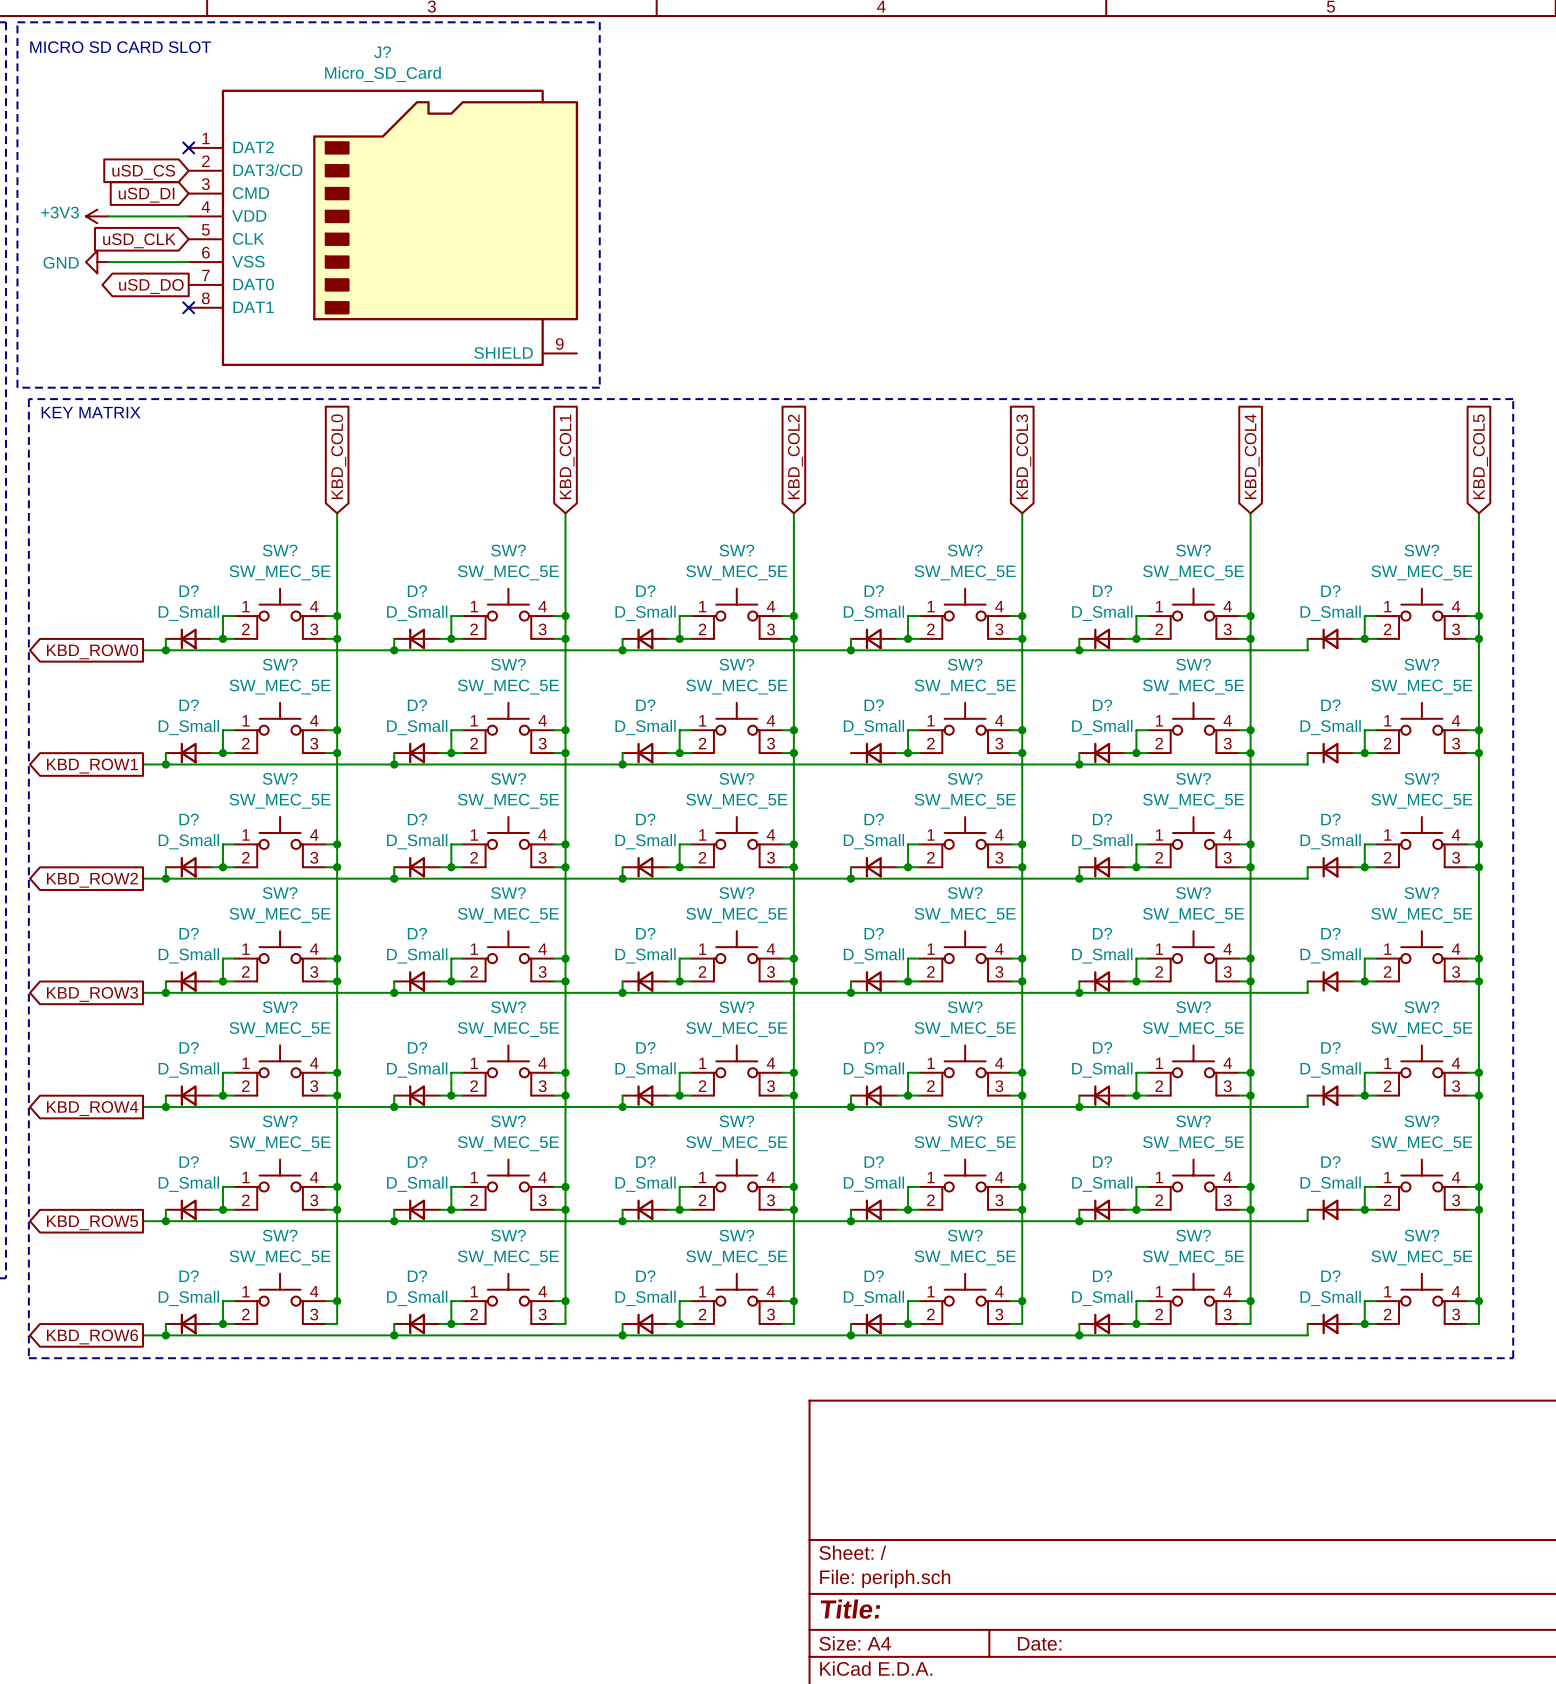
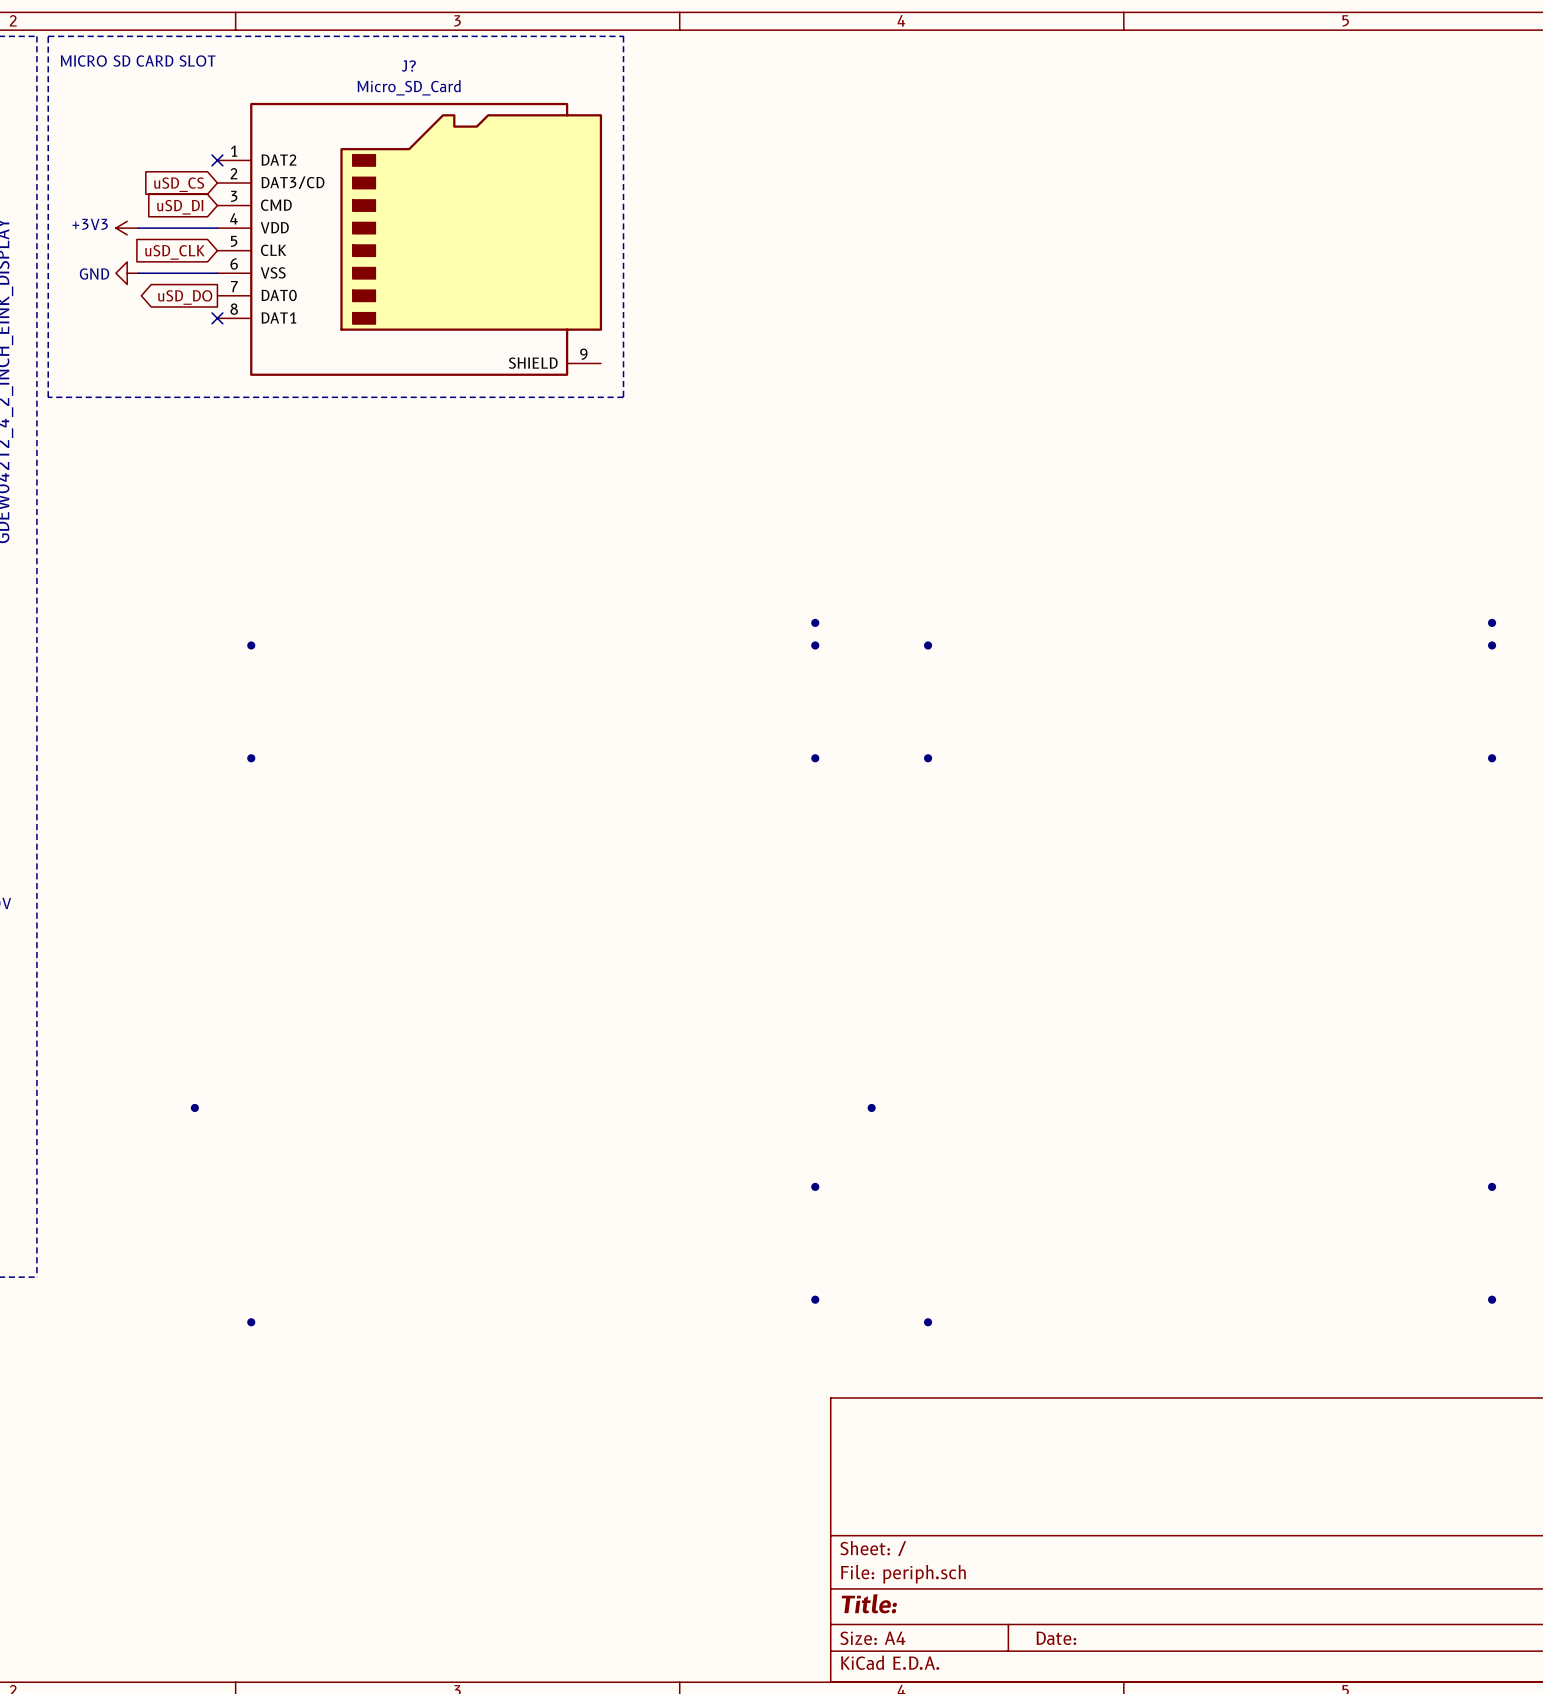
line: (28, 399) (28, 1358) (1513, 1358) (1513, 399) (28, 399) -> none
text: KEY MATRIX (91, 412) -> none
global label: KBD_COL0 (338, 456) -> none
global label: KBD_COL1 (567, 456) -> none
global label: KBD_COL2 (795, 456) -> none
global label: KBD_COL3 (1023, 456) -> none
global label: KBD_COL4 (1252, 456) -> none
global label: KBD_COL5 (1480, 456) -> none
wire: (337, 513) (337, 1323) (325, 1323) -> none
wire: (565, 513) (565, 1323) (554, 1323) -> none
wire: (793, 513) (793, 1323) (782, 1323) -> none
wire: (1022, 513) (1022, 1323) (1010, 1323) -> none
wire: (1250, 513) (1250, 1323) (1239, 1323) -> none
wire: (1478, 513) (1478, 1323) (1467, 1323) -> none
SW?: SW_MEC_5E (280, 613) -> none
SW?: SW_MEC_5E (508, 613) -> none
SW?: SW_MEC_5E (736, 613) -> none
SW?: SW_MEC_5E (965, 613) -> none
SW?: SW_MEC_5E (1193, 613) -> none
SW?: SW_MEC_5E (1421, 613) -> none
wire: (234, 616) (222, 616) (222, 638) -> none
wire: (325, 616) (337, 616) -> none
junction: (337, 616) -> none
wire: (462, 616) (451, 616) (451, 638) -> none
wire: (554, 616) (565, 616) -> none
junction: (565, 616) -> none
wire: (691, 616) (679, 616) (679, 638) -> none
wire: (782, 616) (793, 616) -> none
wire: (919, 616) (908, 616) (908, 638) -> none
wire: (1010, 616) (1022, 616) -> none
junction: (1022, 616) -> none
wire: (1147, 616) (1136, 616) (1136, 638) -> none
wire: (1239, 616) (1250, 616) -> none
junction: (1250, 616) -> none
wire: (1376, 616) (1364, 616) (1364, 638) -> none
wire: (1467, 616) (1478, 616) -> none
wire: (165, 638) (165, 650) -> none
D?: D_Small (188, 638) -> none
wire: (211, 638) (234, 638) -> none
wire: (325, 638) (337, 638) -> none
junction: (337, 638) -> none
wire: (394, 638) (394, 650) -> none
D?: D_Small (417, 638) -> none
wire: (439, 638) (462, 638) -> none
junction: (451, 638) -> none
wire: (554, 638) (565, 638) -> none
junction: (565, 638) -> none
wire: (622, 638) (622, 650) -> none
D?: D_Small (645, 638) -> none
wire: (668, 638) (691, 638) -> none
junction: (679, 638) -> none
wire: (782, 638) (793, 638) -> none
wire: (850, 638) (850, 650) -> none
D?: D_Small (873, 638) -> none
wire: (896, 638) (919, 638) -> none
wire: (1010, 638) (1022, 638) -> none
junction: (1022, 638) -> none
wire: (1079, 638) (1079, 650) -> none
D?: D_Small (1102, 638) -> none
wire: (1124, 638) (1147, 638) -> none
junction: (1136, 638) -> none
wire: (1239, 638) (1250, 638) -> none
junction: (1250, 638) -> none
wire: (1307, 638) (1307, 650) (143, 650) -> none
D?: D_Small (1330, 638) -> none
wire: (1353, 638) (1376, 638) -> none
junction: (1364, 638) -> none
wire: (1467, 638) (1478, 638) -> none
junction: (165, 650) -> none
junction: (394, 650) -> none
junction: (622, 650) -> none
junction: (850, 650) -> none
junction: (1079, 650) -> none
global label: KBD_ROW0 (92, 651) -> none
SW?: SW_MEC_5E (280, 727) -> none
SW?: SW_MEC_5E (508, 727) -> none
SW?: SW_MEC_5E (736, 727) -> none
SW?: SW_MEC_5E (965, 727) -> none
SW?: SW_MEC_5E (1193, 727) -> none
SW?: SW_MEC_5E (1421, 727) -> none
wire: (234, 730) (222, 730) (222, 753) -> none
wire: (325, 730) (337, 730) -> none
junction: (337, 730) -> none
wire: (462, 730) (451, 730) (451, 753) -> none
wire: (554, 730) (565, 730) -> none
junction: (565, 730) -> none
wire: (691, 730) (679, 730) (679, 753) -> none
wire: (782, 730) (793, 730) -> none
junction: (793, 730) -> none
wire: (919, 730) (908, 730) (908, 753) -> none
wire: (1010, 730) (1022, 730) -> none
junction: (1022, 730) -> none
wire: (1147, 730) (1136, 730) (1136, 753) -> none
wire: (1239, 730) (1250, 730) -> none
junction: (1250, 730) -> none
wire: (1376, 730) (1364, 730) (1364, 753) -> none
wire: (1467, 730) (1478, 730) -> none
junction: (1478, 730) -> none
wire: (165, 753) (165, 764) -> none
D?: D_Small (188, 753) -> none
wire: (211, 753) (234, 753) -> none
wire: (325, 753) (337, 753) -> none
junction: (337, 753) -> none
wire: (394, 753) (394, 764) -> none
D?: D_Small (417, 753) -> none
wire: (439, 753) (462, 753) -> none
junction: (451, 753) -> none
wire: (554, 753) (565, 753) -> none
junction: (565, 753) -> none
wire: (622, 753) (622, 764) -> none
D?: D_Small (645, 753) -> none
wire: (668, 753) (691, 753) -> none
junction: (679, 753) -> none
wire: (782, 753) (793, 753) -> none
D?: D_Small (873, 753) -> none
wire: (896, 753) (919, 753) -> none
wire: (1010, 753) (1022, 753) -> none
junction: (1022, 753) -> none
wire: (1079, 753) (1079, 764) -> none
D?: D_Small (1102, 753) -> none
wire: (1124, 753) (1147, 753) -> none
junction: (1136, 753) -> none
wire: (1239, 753) (1250, 753) -> none
junction: (1250, 753) -> none
wire: (1307, 753) (1307, 764) (143, 764) -> none
D?: D_Small (1330, 753) -> none
wire: (1353, 753) (1376, 753) -> none
junction: (1364, 753) -> none
wire: (1467, 753) (1478, 753) -> none
junction: (165, 764) -> none
junction: (394, 764) -> none
junction: (622, 764) -> none
junction: (1079, 764) -> none
global label: KBD_ROW1 (92, 766) -> none
SW?: SW_MEC_5E (280, 842) -> none
SW?: SW_MEC_5E (508, 842) -> none
SW?: SW_MEC_5E (736, 842) -> none
SW?: SW_MEC_5E (965, 842) -> none
SW?: SW_MEC_5E (1193, 842) -> none
SW?: SW_MEC_5E (1421, 842) -> none
wire: (234, 844) (222, 844) (222, 867) -> none
wire: (325, 844) (337, 844) -> none
junction: (337, 844) -> none
wire: (462, 844) (451, 844) (451, 867) -> none
wire: (554, 844) (565, 844) -> none
junction: (565, 844) -> none
wire: (691, 844) (679, 844) (679, 867) -> none
wire: (782, 844) (793, 844) -> none
junction: (793, 844) -> none
wire: (919, 844) (908, 844) (908, 867) -> none
wire: (1010, 844) (1022, 844) -> none
junction: (1022, 844) -> none
wire: (1147, 844) (1136, 844) (1136, 867) -> none
wire: (1239, 844) (1250, 844) -> none
junction: (1250, 844) -> none
wire: (1376, 844) (1364, 844) (1364, 867) -> none
wire: (1467, 844) (1478, 844) -> none
junction: (1478, 844) -> none
wire: (165, 867) (165, 878) -> none
D?: D_Small (188, 867) -> none
wire: (211, 867) (234, 867) -> none
junction: (222, 867) -> none
wire: (325, 867) (337, 867) -> none
junction: (337, 867) -> none
wire: (394, 867) (394, 878) -> none
D?: D_Small (417, 867) -> none
wire: (439, 867) (462, 867) -> none
junction: (451, 867) -> none
wire: (554, 867) (565, 867) -> none
junction: (565, 867) -> none
wire: (622, 867) (622, 878) -> none
D?: D_Small (645, 867) -> none
wire: (668, 867) (691, 867) -> none
junction: (679, 867) -> none
wire: (782, 867) (793, 867) -> none
junction: (793, 867) -> none
wire: (850, 867) (850, 878) -> none
D?: D_Small (873, 867) -> none
wire: (896, 867) (919, 867) -> none
junction: (908, 867) -> none
wire: (1010, 867) (1022, 867) -> none
junction: (1022, 867) -> none
wire: (1079, 867) (1079, 878) -> none
D?: D_Small (1102, 867) -> none
wire: (1124, 867) (1147, 867) -> none
junction: (1136, 867) -> none
wire: (1239, 867) (1250, 867) -> none
junction: (1250, 867) -> none
wire: (1307, 867) (1307, 878) (143, 878) -> none
D?: D_Small (1330, 867) -> none
wire: (1353, 867) (1376, 867) -> none
junction: (1364, 867) -> none
wire: (1467, 867) (1478, 867) -> none
junction: (1478, 867) -> none
junction: (165, 878) -> none
junction: (394, 878) -> none
junction: (622, 878) -> none
junction: (850, 878) -> none
junction: (1079, 878) -> none
global label: KBD_ROW2 (92, 880) -> none
SW?: SW_MEC_5E (280, 956) -> none
SW?: SW_MEC_5E (508, 956) -> none
SW?: SW_MEC_5E (736, 956) -> none
SW?: SW_MEC_5E (965, 956) -> none
SW?: SW_MEC_5E (1193, 956) -> none
SW?: SW_MEC_5E (1421, 956) -> none
wire: (234, 958) (222, 958) (222, 981) -> none
wire: (325, 958) (337, 958) -> none
junction: (337, 958) -> none
wire: (462, 958) (451, 958) (451, 981) -> none
wire: (554, 958) (565, 958) -> none
junction: (565, 958) -> none
wire: (691, 958) (679, 958) (679, 981) -> none
wire: (782, 958) (793, 958) -> none
junction: (793, 958) -> none
wire: (919, 958) (908, 958) (908, 981) -> none
wire: (1010, 958) (1022, 958) -> none
junction: (1022, 958) -> none
wire: (1147, 958) (1136, 958) (1136, 981) -> none
wire: (1239, 958) (1250, 958) -> none
junction: (1250, 958) -> none
wire: (1376, 958) (1364, 958) (1364, 981) -> none
wire: (1467, 958) (1478, 958) -> none
junction: (1478, 958) -> none
wire: (165, 981) (165, 992) -> none
D?: D_Small (188, 981) -> none
wire: (211, 981) (234, 981) -> none
junction: (222, 981) -> none
wire: (325, 981) (337, 981) -> none
junction: (337, 981) -> none
wire: (394, 981) (394, 992) -> none
D?: D_Small (417, 981) -> none
wire: (439, 981) (462, 981) -> none
junction: (451, 981) -> none
wire: (554, 981) (565, 981) -> none
junction: (565, 981) -> none
wire: (622, 981) (622, 992) -> none
D?: D_Small (645, 981) -> none
wire: (668, 981) (691, 981) -> none
junction: (679, 981) -> none
wire: (782, 981) (793, 981) -> none
junction: (793, 981) -> none
wire: (850, 981) (850, 992) -> none
D?: D_Small (873, 981) -> none
wire: (896, 981) (919, 981) -> none
junction: (908, 981) -> none
wire: (1010, 981) (1022, 981) -> none
junction: (1022, 981) -> none
wire: (1079, 981) (1079, 992) -> none
D?: D_Small (1102, 981) -> none
wire: (1124, 981) (1147, 981) -> none
junction: (1136, 981) -> none
wire: (1239, 981) (1250, 981) -> none
junction: (1250, 981) -> none
wire: (1307, 981) (1307, 992) (143, 992) -> none
D?: D_Small (1330, 981) -> none
wire: (1353, 981) (1376, 981) -> none
junction: (1364, 981) -> none
wire: (1467, 981) (1478, 981) -> none
junction: (1478, 981) -> none
junction: (165, 992) -> none
junction: (394, 992) -> none
junction: (622, 992) -> none
junction: (850, 992) -> none
junction: (1079, 992) -> none
global label: KBD_ROW3 (92, 994) -> none
SW?: SW_MEC_5E (280, 1070) -> none
SW?: SW_MEC_5E (508, 1070) -> none
SW?: SW_MEC_5E (736, 1070) -> none
SW?: SW_MEC_5E (965, 1070) -> none
SW?: SW_MEC_5E (1193, 1070) -> none
SW?: SW_MEC_5E (1421, 1070) -> none
wire: (234, 1072) (222, 1072) (222, 1095) -> none
wire: (325, 1072) (337, 1072) -> none
junction: (337, 1072) -> none
wire: (462, 1072) (451, 1072) (451, 1095) -> none
wire: (554, 1072) (565, 1072) -> none
junction: (565, 1072) -> none
wire: (691, 1072) (679, 1072) (679, 1095) -> none
wire: (782, 1072) (793, 1072) -> none
junction: (793, 1072) -> none
wire: (919, 1072) (908, 1072) (908, 1095) -> none
wire: (1010, 1072) (1022, 1072) -> none
junction: (1022, 1072) -> none
wire: (1147, 1072) (1136, 1072) (1136, 1095) -> none
wire: (1239, 1072) (1250, 1072) -> none
junction: (1250, 1072) -> none
wire: (1376, 1072) (1364, 1072) (1364, 1095) -> none
wire: (1467, 1072) (1478, 1072) -> none
junction: (1478, 1072) -> none
wire: (165, 1095) (165, 1107) -> none
D?: D_Small (188, 1095) -> none
wire: (211, 1095) (234, 1095) -> none
junction: (222, 1095) -> none
wire: (325, 1095) (337, 1095) -> none
junction: (337, 1095) -> none
wire: (394, 1095) (394, 1107) -> none
D?: D_Small (417, 1095) -> none
wire: (439, 1095) (462, 1095) -> none
junction: (451, 1095) -> none
wire: (554, 1095) (565, 1095) -> none
junction: (565, 1095) -> none
wire: (622, 1095) (622, 1107) -> none
D?: D_Small (645, 1095) -> none
wire: (668, 1095) (691, 1095) -> none
junction: (679, 1095) -> none
wire: (782, 1095) (793, 1095) -> none
junction: (793, 1095) -> none
wire: (850, 1095) (850, 1107) -> none
D?: D_Small (873, 1095) -> none
wire: (896, 1095) (919, 1095) -> none
junction: (908, 1095) -> none
wire: (1010, 1095) (1022, 1095) -> none
junction: (1022, 1095) -> none
wire: (1079, 1095) (1079, 1107) -> none
D?: D_Small (1102, 1095) -> none
wire: (1124, 1095) (1147, 1095) -> none
junction: (1136, 1095) -> none
wire: (1239, 1095) (1250, 1095) -> none
junction: (1250, 1095) -> none
wire: (1307, 1095) (1307, 1107) (143, 1107) -> none
D?: D_Small (1330, 1095) -> none
wire: (1353, 1095) (1376, 1095) -> none
junction: (1364, 1095) -> none
wire: (1467, 1095) (1478, 1095) -> none
junction: (1478, 1095) -> none
junction: (394, 1107) -> none
junction: (622, 1107) -> none
junction: (1079, 1107) -> none
global label: KBD_ROW4 (92, 1108) -> none
SW?: SW_MEC_5E (280, 1184) -> none
SW?: SW_MEC_5E (508, 1184) -> none
SW?: SW_MEC_5E (736, 1184) -> none
SW?: SW_MEC_5E (965, 1184) -> none
SW?: SW_MEC_5E (1193, 1184) -> none
SW?: SW_MEC_5E (1421, 1184) -> none
wire: (234, 1186) (222, 1186) (222, 1209) -> none
wire: (325, 1186) (337, 1186) -> none
junction: (337, 1186) -> none
wire: (462, 1186) (451, 1186) (451, 1209) -> none
wire: (554, 1186) (565, 1186) -> none
junction: (565, 1186) -> none
wire: (691, 1186) (679, 1186) (679, 1209) -> none
wire: (782, 1186) (793, 1186) -> none
wire: (919, 1186) (908, 1186) (908, 1209) -> none
wire: (1010, 1186) (1022, 1186) -> none
junction: (1022, 1186) -> none
wire: (1147, 1186) (1136, 1186) (1136, 1209) -> none
wire: (1239, 1186) (1250, 1186) -> none
junction: (1250, 1186) -> none
wire: (1376, 1186) (1364, 1186) (1364, 1209) -> none
wire: (1467, 1186) (1478, 1186) -> none
wire: (165, 1209) (165, 1221) -> none
D?: D_Small (188, 1209) -> none
wire: (211, 1209) (234, 1209) -> none
junction: (222, 1209) -> none
wire: (325, 1209) (337, 1209) -> none
junction: (337, 1209) -> none
wire: (394, 1209) (394, 1221) -> none
D?: D_Small (417, 1209) -> none
wire: (439, 1209) (462, 1209) -> none
junction: (451, 1209) -> none
wire: (554, 1209) (565, 1209) -> none
junction: (565, 1209) -> none
wire: (622, 1209) (622, 1221) -> none
D?: D_Small (645, 1209) -> none
wire: (668, 1209) (691, 1209) -> none
junction: (679, 1209) -> none
wire: (782, 1209) (793, 1209) -> none
junction: (793, 1209) -> none
wire: (850, 1209) (850, 1221) -> none
D?: D_Small (873, 1209) -> none
wire: (896, 1209) (919, 1209) -> none
junction: (908, 1209) -> none
wire: (1010, 1209) (1022, 1209) -> none
junction: (1022, 1209) -> none
wire: (1079, 1209) (1079, 1221) -> none
D?: D_Small (1102, 1209) -> none
wire: (1124, 1209) (1147, 1209) -> none
junction: (1136, 1209) -> none
wire: (1239, 1209) (1250, 1209) -> none
junction: (1250, 1209) -> none
wire: (1307, 1209) (1307, 1221) (143, 1221) -> none
D?: D_Small (1330, 1209) -> none
wire: (1353, 1209) (1376, 1209) -> none
junction: (1364, 1209) -> none
wire: (1467, 1209) (1478, 1209) -> none
junction: (1478, 1209) -> none
junction: (165, 1221) -> none
junction: (394, 1221) -> none
junction: (622, 1221) -> none
junction: (850, 1221) -> none
junction: (1079, 1221) -> none
global label: KBD_ROW5 (92, 1222) -> none
SW?: SW_MEC_5E (280, 1298) -> none
SW?: SW_MEC_5E (508, 1298) -> none
SW?: SW_MEC_5E (736, 1298) -> none
SW?: SW_MEC_5E (965, 1298) -> none
SW?: SW_MEC_5E (1193, 1298) -> none
SW?: SW_MEC_5E (1421, 1298) -> none
wire: (234, 1301) (222, 1301) (222, 1323) -> none
wire: (325, 1301) (337, 1301) -> none
junction: (337, 1301) -> none
wire: (462, 1301) (451, 1301) (451, 1323) -> none
wire: (554, 1301) (565, 1301) -> none
junction: (565, 1301) -> none
wire: (691, 1301) (679, 1301) (679, 1323) -> none
wire: (782, 1301) (793, 1301) -> none
wire: (919, 1301) (908, 1301) (908, 1323) -> none
wire: (1010, 1301) (1022, 1301) -> none
junction: (1022, 1301) -> none
wire: (1147, 1301) (1136, 1301) (1136, 1323) -> none
wire: (1239, 1301) (1250, 1301) -> none
junction: (1250, 1301) -> none
wire: (1376, 1301) (1364, 1301) (1364, 1323) -> none
wire: (1467, 1301) (1478, 1301) -> none
wire: (165, 1323) (165, 1335) -> none
D?: D_Small (188, 1323) -> none
wire: (211, 1323) (234, 1323) -> none
wire: (394, 1323) (394, 1335) -> none
D?: D_Small (417, 1323) -> none
wire: (439, 1323) (462, 1323) -> none
junction: (451, 1323) -> none
wire: (622, 1323) (622, 1335) -> none
D?: D_Small (645, 1323) -> none
wire: (668, 1323) (691, 1323) -> none
junction: (679, 1323) -> none
wire: (850, 1323) (850, 1335) -> none
D?: D_Small (873, 1323) -> none
wire: (896, 1323) (919, 1323) -> none
wire: (1079, 1323) (1079, 1335) -> none
D?: D_Small (1102, 1323) -> none
wire: (1124, 1323) (1147, 1323) -> none
junction: (1136, 1323) -> none
wire: (1307, 1323) (1307, 1335) (143, 1335) -> none
D?: D_Small (1330, 1323) -> none
wire: (1353, 1323) (1376, 1323) -> none
junction: (1364, 1323) -> none
junction: (165, 1335) -> none
junction: (394, 1335) -> none
junction: (622, 1335) -> none
junction: (850, 1335) -> none
junction: (1079, 1335) -> none
global label: KBD_ROW6 (92, 1336) -> none

